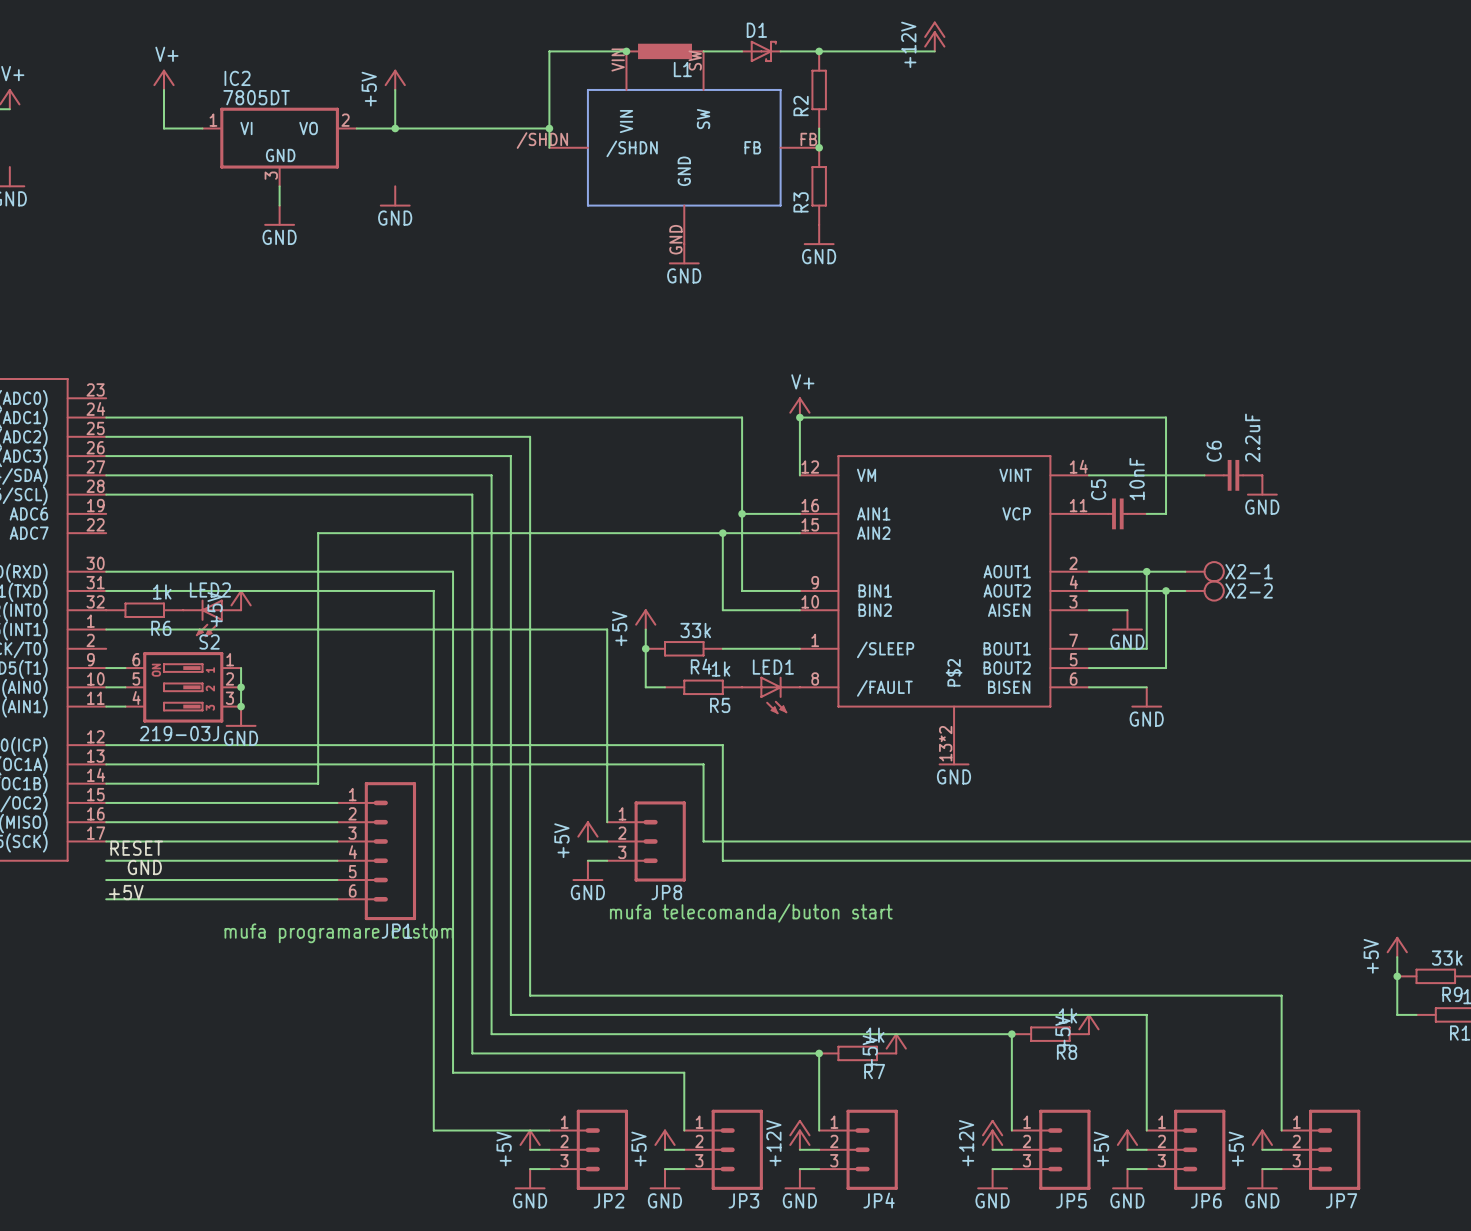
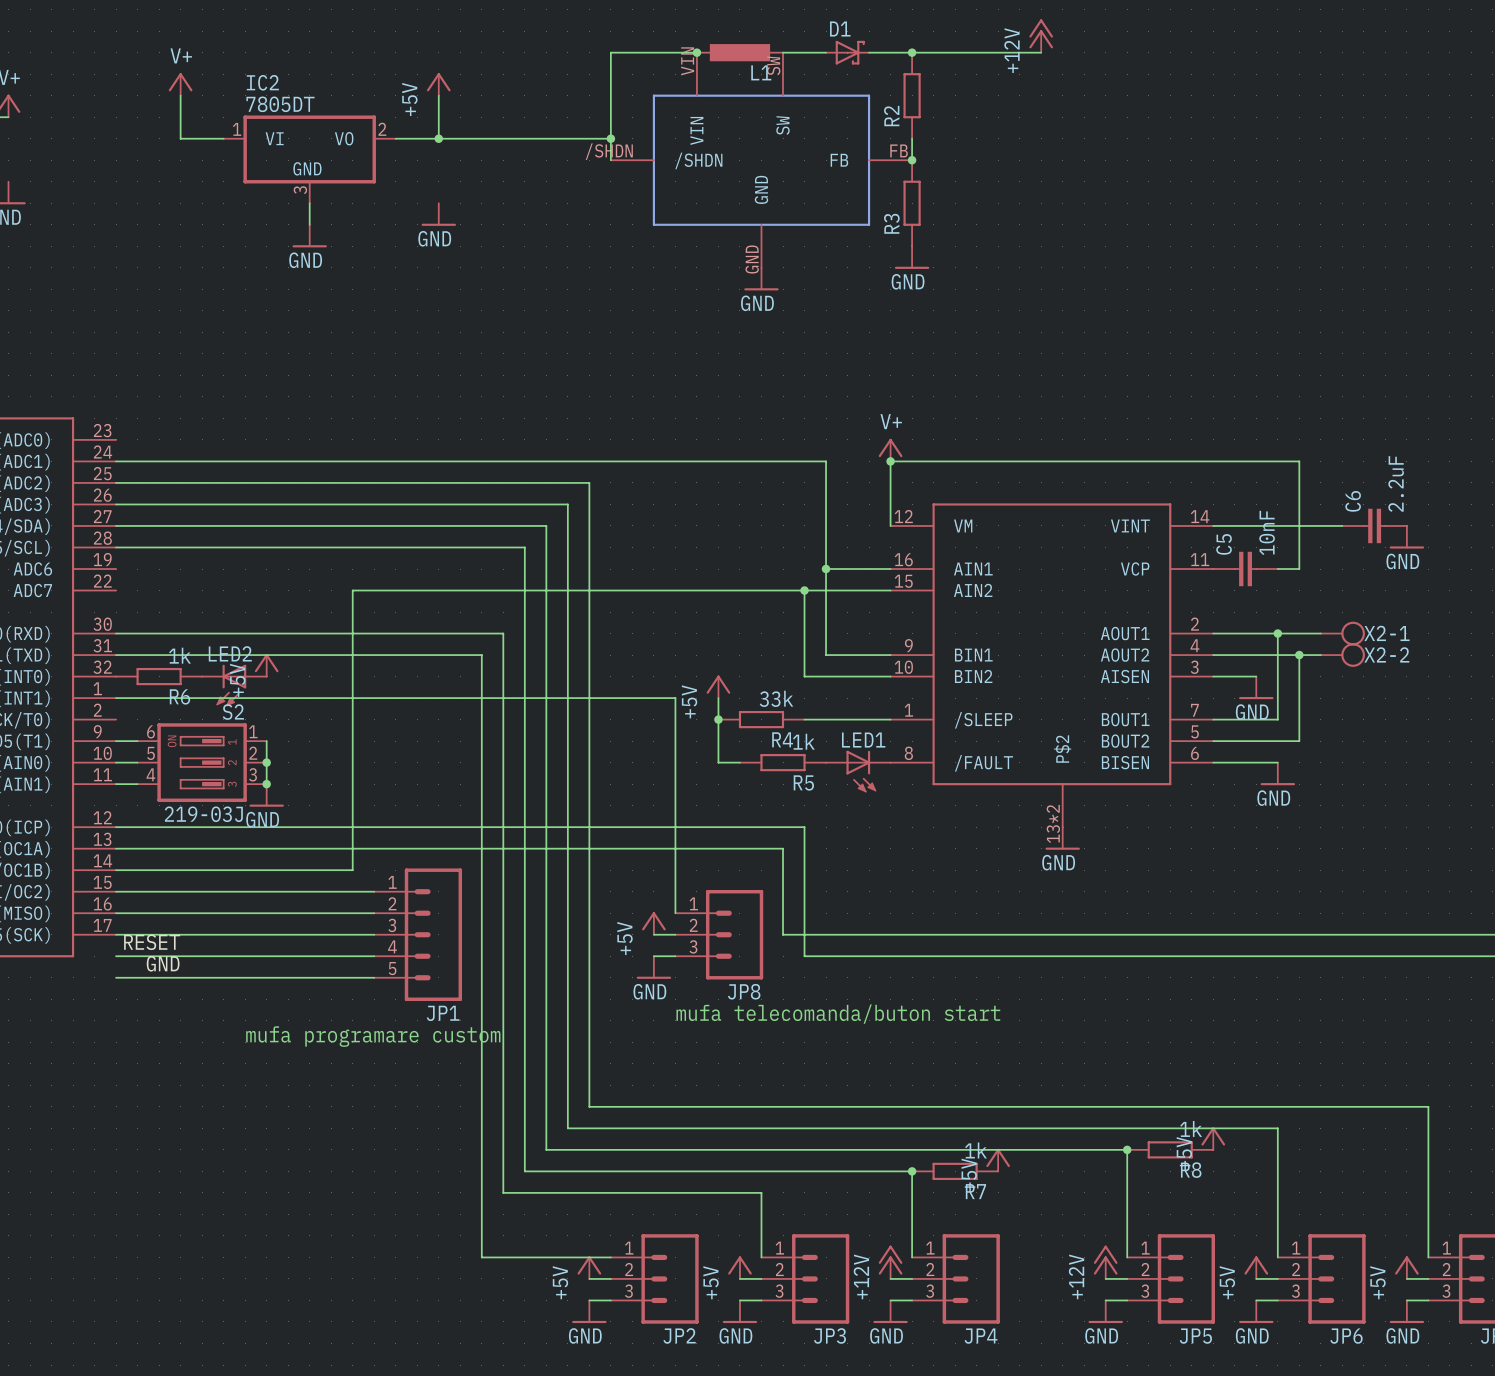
JP1 symbol: [337, 782, 417, 921] -> [374, 868, 463, 1002]
label: +5V (126, 892) -> none
wire: (106, 899) (337, 899) -> none

